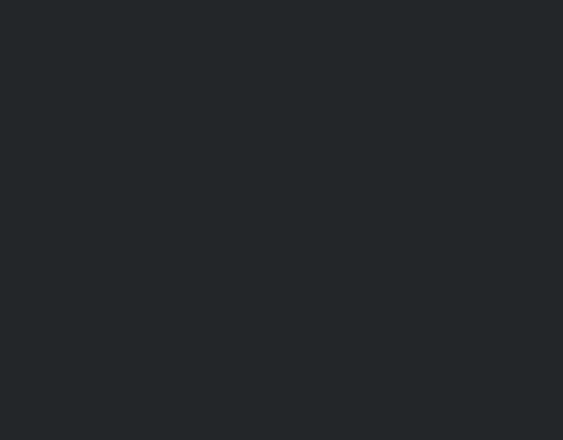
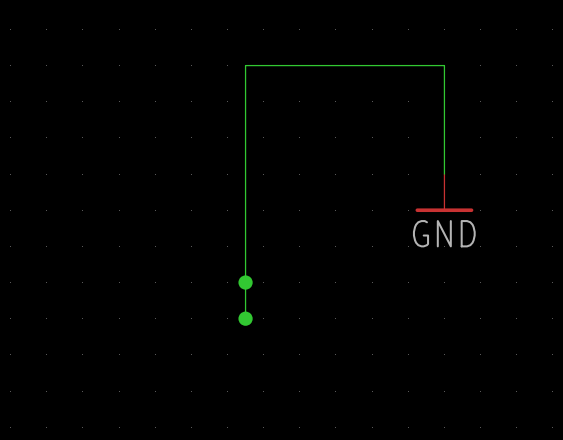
wire: none -> (444, 174) (444, 65) (245, 65) (245, 318)
power symbol: none -> GND (444, 193)
junction: none -> (245, 282)
junction: none -> (245, 318)

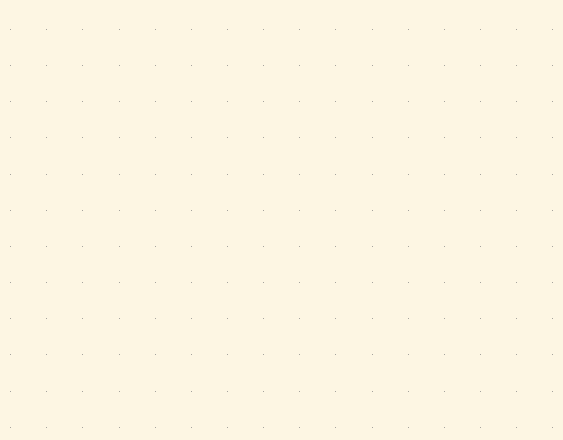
wire: (444, 174) (444, 65) (245, 65) (245, 318) -> none
power symbol: GND (444, 193) -> none
junction: (245, 282) -> none
junction: (245, 318) -> none

